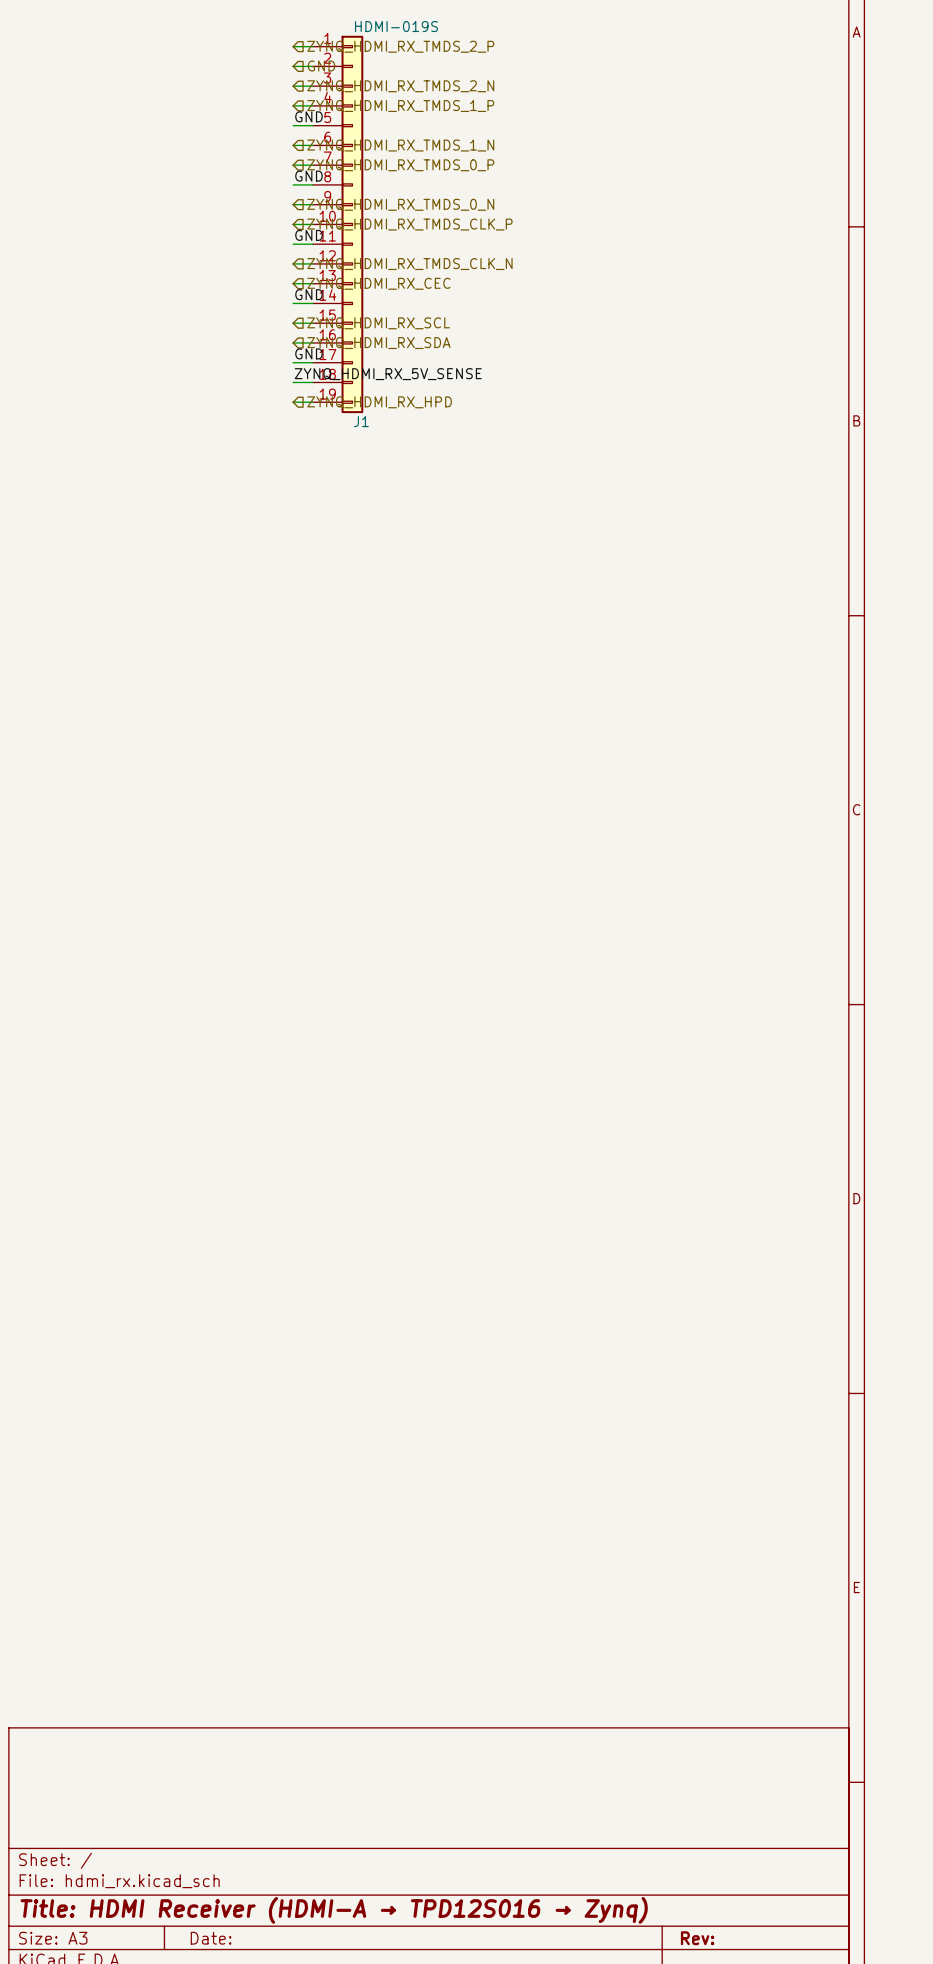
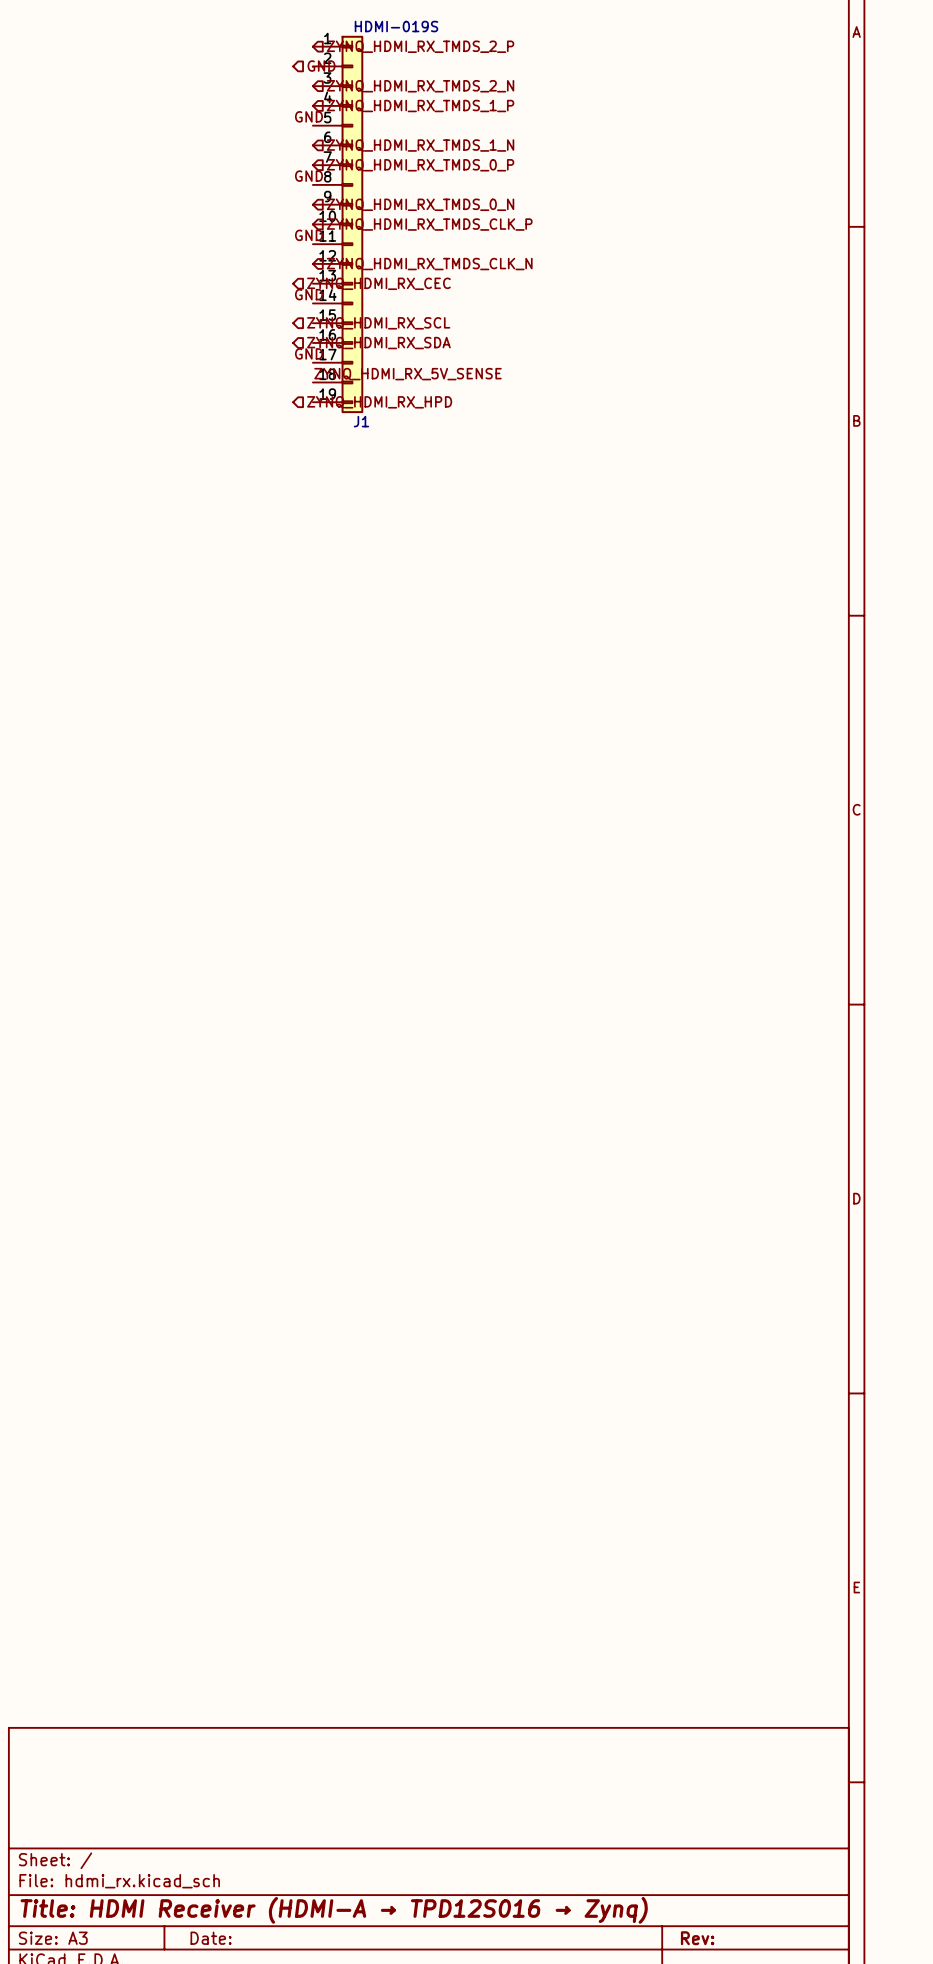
wire: (293, 46) (312, 46) -> none
hierarchical label position: ZYNQ_HDMI_RX_TMDS_2_P (400, 46) -> ZYNQ_HDMI_RX_TMDS_2_P (420, 46)
wire: (293, 66) (312, 66) -> none
wire: (293, 86) (312, 86) -> none
hierarchical label position: ZYNQ_HDMI_RX_TMDS_2_N (400, 86) -> ZYNQ_HDMI_RX_TMDS_2_N (420, 86)
wire: (293, 105) (312, 105) -> none
hierarchical label position: ZYNQ_HDMI_RX_TMDS_1_P (400, 106) -> ZYNQ_HDMI_RX_TMDS_1_P (420, 106)
wire: (293, 125) (312, 125) -> none
wire: (293, 145) (312, 145) -> none
hierarchical label position: ZYNQ_HDMI_RX_TMDS_1_N (400, 145) -> ZYNQ_HDMI_RX_TMDS_1_N (420, 145)
wire: (293, 165) (312, 165) -> none
hierarchical label position: ZYNQ_HDMI_RX_TMDS_0_P (400, 165) -> ZYNQ_HDMI_RX_TMDS_0_P (420, 165)
wire: (293, 184) (312, 184) -> none
wire: (293, 204) (312, 204) -> none
hierarchical label position: ZYNQ_HDMI_RX_TMDS_0_N (400, 204) -> ZYNQ_HDMI_RX_TMDS_0_N (420, 204)
wire: (293, 224) (312, 224) -> none
hierarchical label position: ZYNQ_HDMI_RX_TMDS_CLK_P (409, 224) -> ZYNQ_HDMI_RX_TMDS_CLK_P (429, 224)
wire: (293, 244) (312, 244) -> none
wire: (293, 263) (312, 263) -> none
hierarchical label position: ZYNQ_HDMI_RX_TMDS_CLK_N (409, 264) -> ZYNQ_HDMI_RX_TMDS_CLK_N (429, 264)
wire: (293, 283) (312, 283) -> none
wire: (293, 303) (312, 303) -> none
wire: (293, 323) (312, 323) -> none
wire: (293, 342) (312, 342) -> none
wire: (293, 362) (312, 362) -> none
label position: ZYNQ_HDMI_RX_5V_SENSE (388, 374) -> ZYNQ_HDMI_RX_5V_SENSE (407, 374)
wire: (293, 382) (312, 382) -> none
wire: (293, 402) (312, 402) -> none

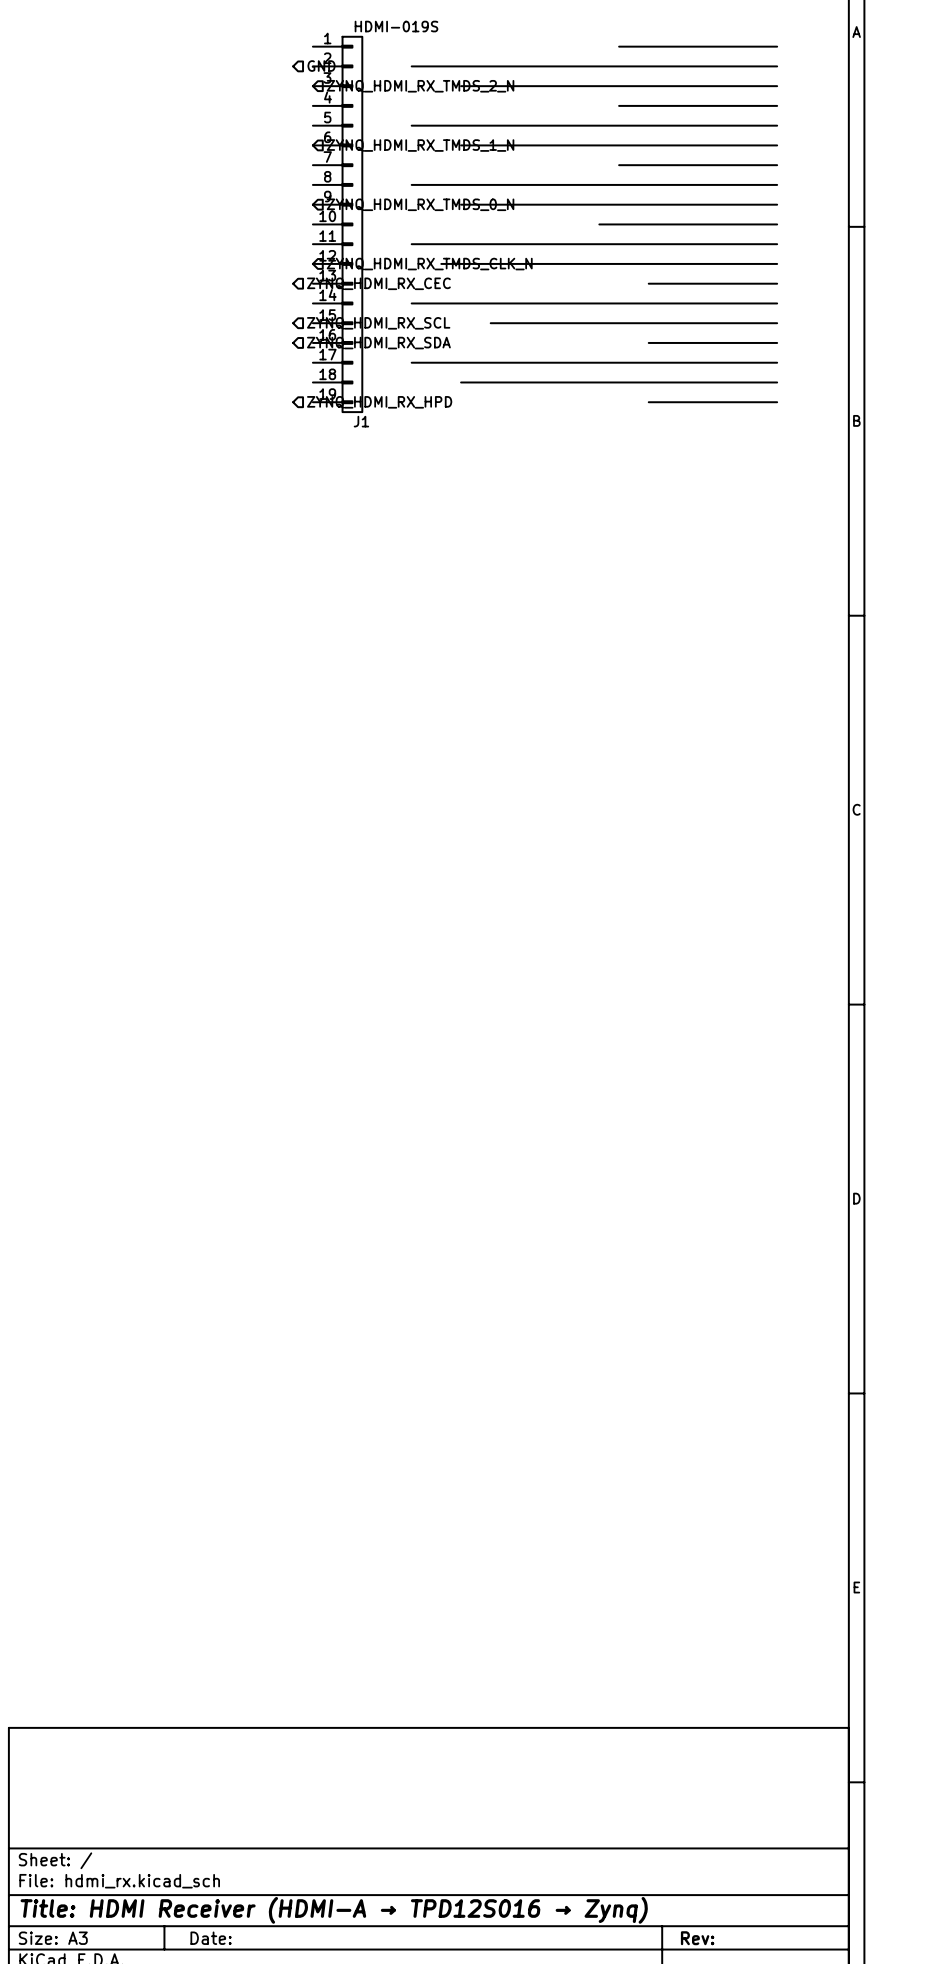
hierarchical label: ZYNQ_HDMI_RX_TMDS_2_P (420, 46) -> none
wire: none -> (619, 46) (777, 46)
wire: none -> (411, 66) (777, 66)
wire: none -> (461, 86) (777, 86)
wire: none -> (619, 105) (777, 105)
hierarchical label: ZYNQ_HDMI_RX_TMDS_1_P (420, 106) -> none
label: GND (308, 116) -> none
wire: none -> (411, 125) (777, 125)
wire: none -> (461, 145) (777, 145)
hierarchical label: ZYNQ_HDMI_RX_TMDS_0_P (420, 165) -> none
wire: none -> (619, 165) (777, 165)
label: GND (308, 176) -> none
wire: none -> (411, 184) (777, 184)
wire: none -> (461, 204) (777, 204)
hierarchical label: ZYNQ_HDMI_RX_TMDS_CLK_P (429, 224) -> none
wire: none -> (599, 224) (777, 224)
label: GND (308, 235) -> none
wire: none -> (411, 244) (777, 244)
wire: none -> (441, 263) (777, 263)
wire: none -> (648, 283) (777, 283)
label: GND (308, 294) -> none
wire: none -> (411, 303) (777, 303)
wire: none -> (490, 323) (777, 323)
wire: none -> (648, 342) (777, 342)
label: GND (308, 353) -> none
wire: none -> (411, 362) (777, 362)
label: ZYNQ_HDMI_RX_5V_SENSE (407, 374) -> none
wire: none -> (461, 382) (777, 382)
wire: none -> (648, 402) (777, 402)

